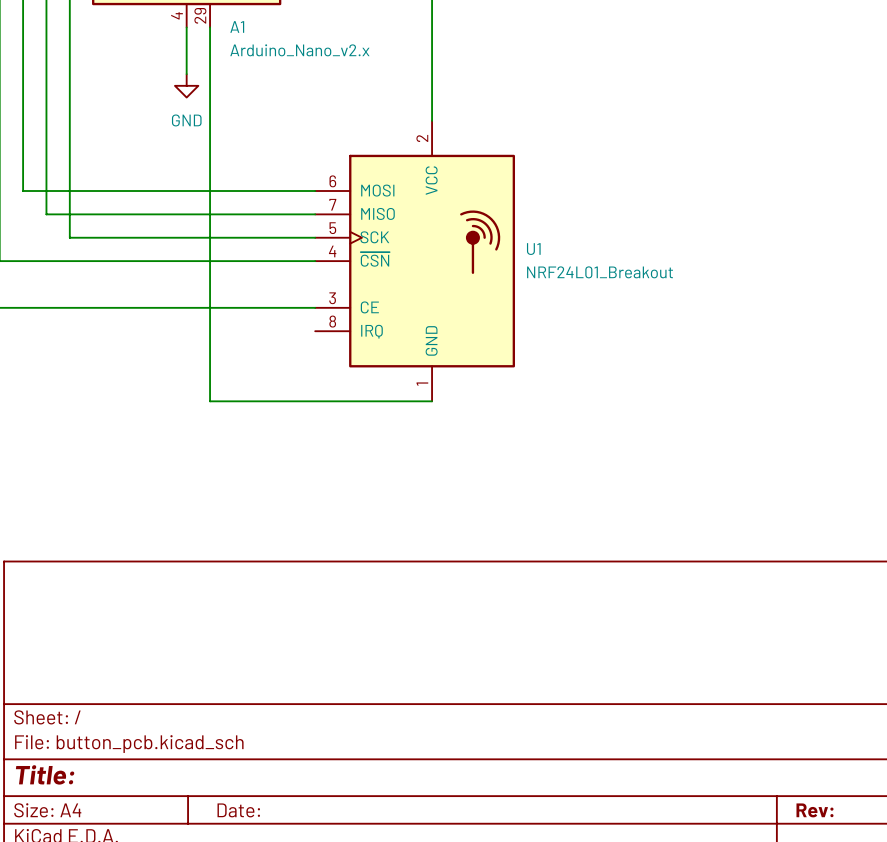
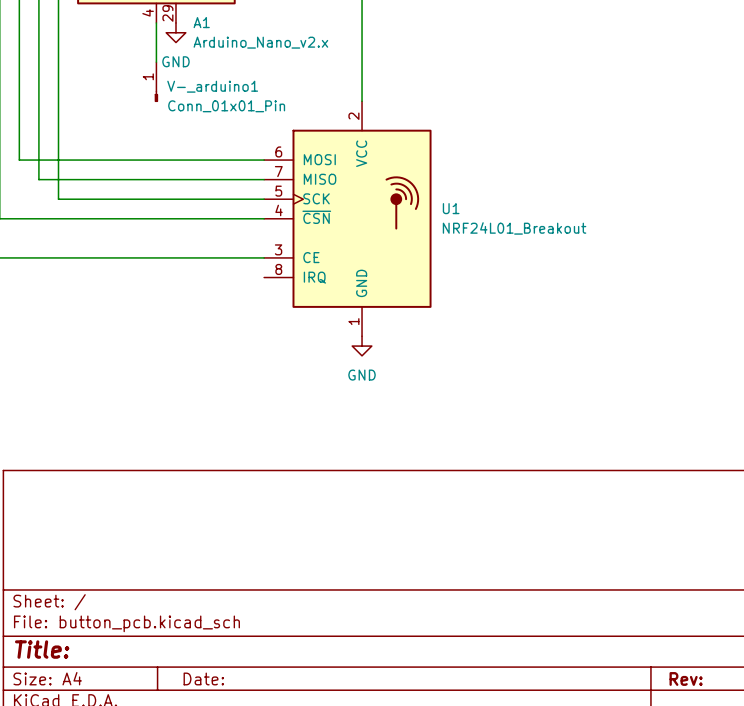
wire: (210, 27) (210, 401) (432, 401) -> none
power symbol position: GND (186, 85) -> GND (175, 32)
V-_arduino1: none -> Conn_01x01_Pin (156, 82)
power symbol: none -> GND (362, 346)

